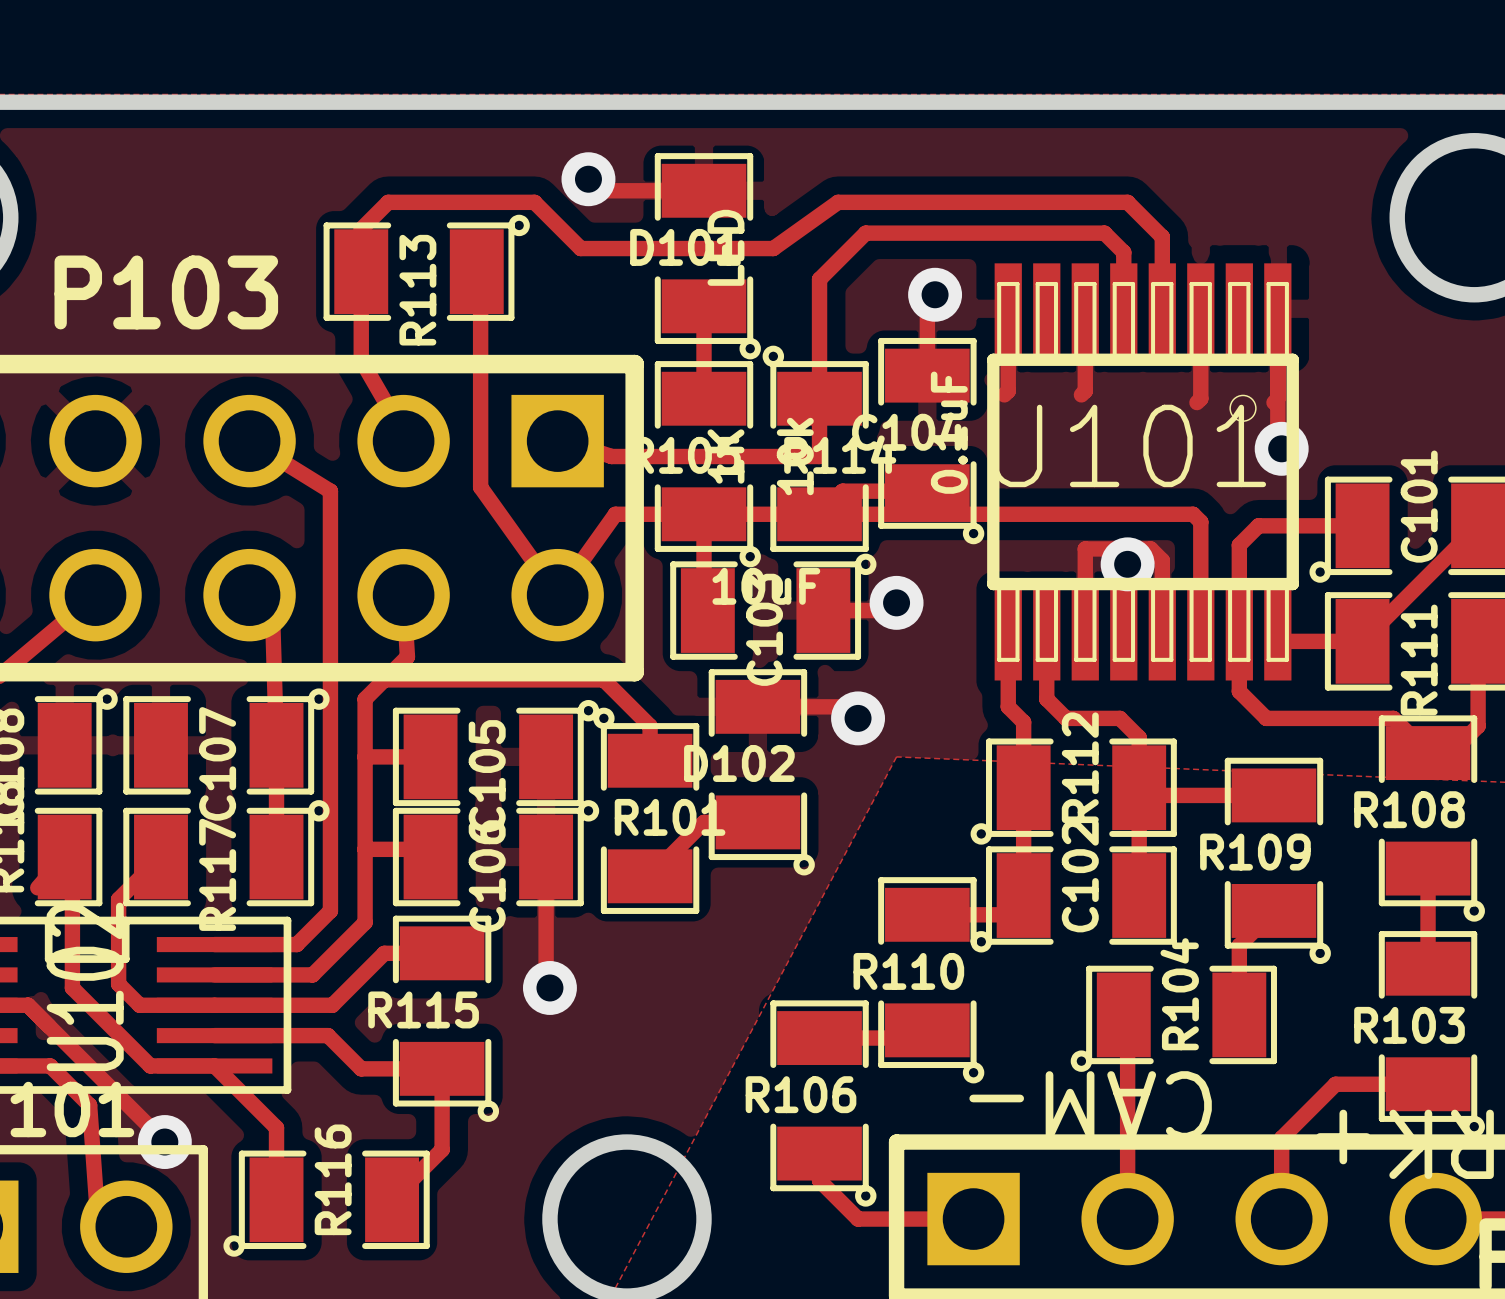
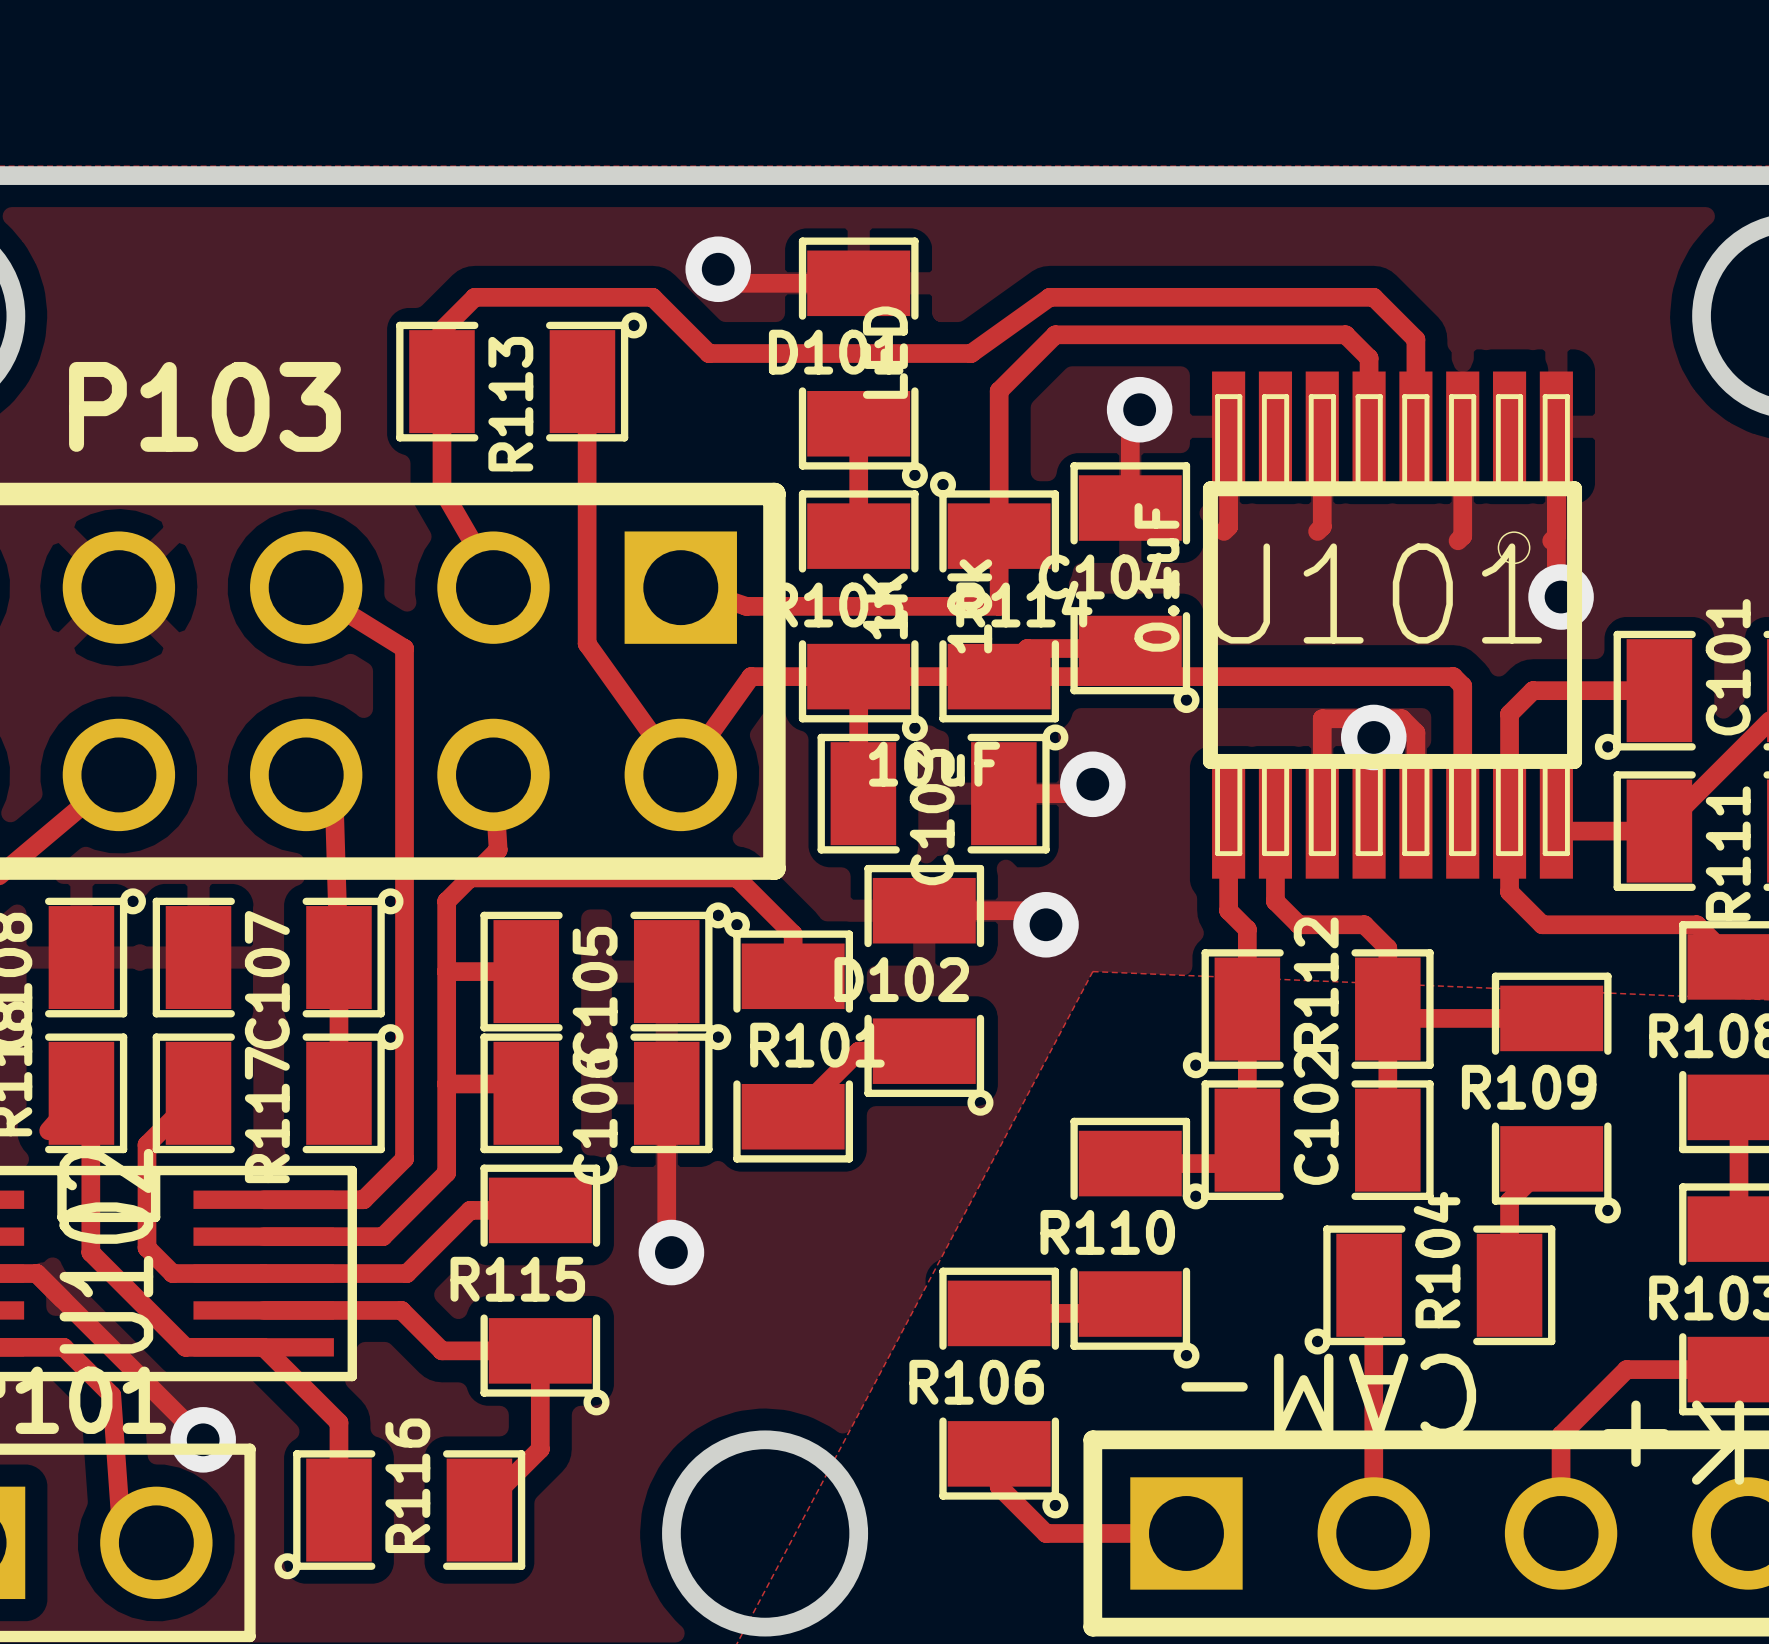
track: (861, 202) (838, 202) (773, 248) -> (1049, 297) (971, 353) (942, 353)

